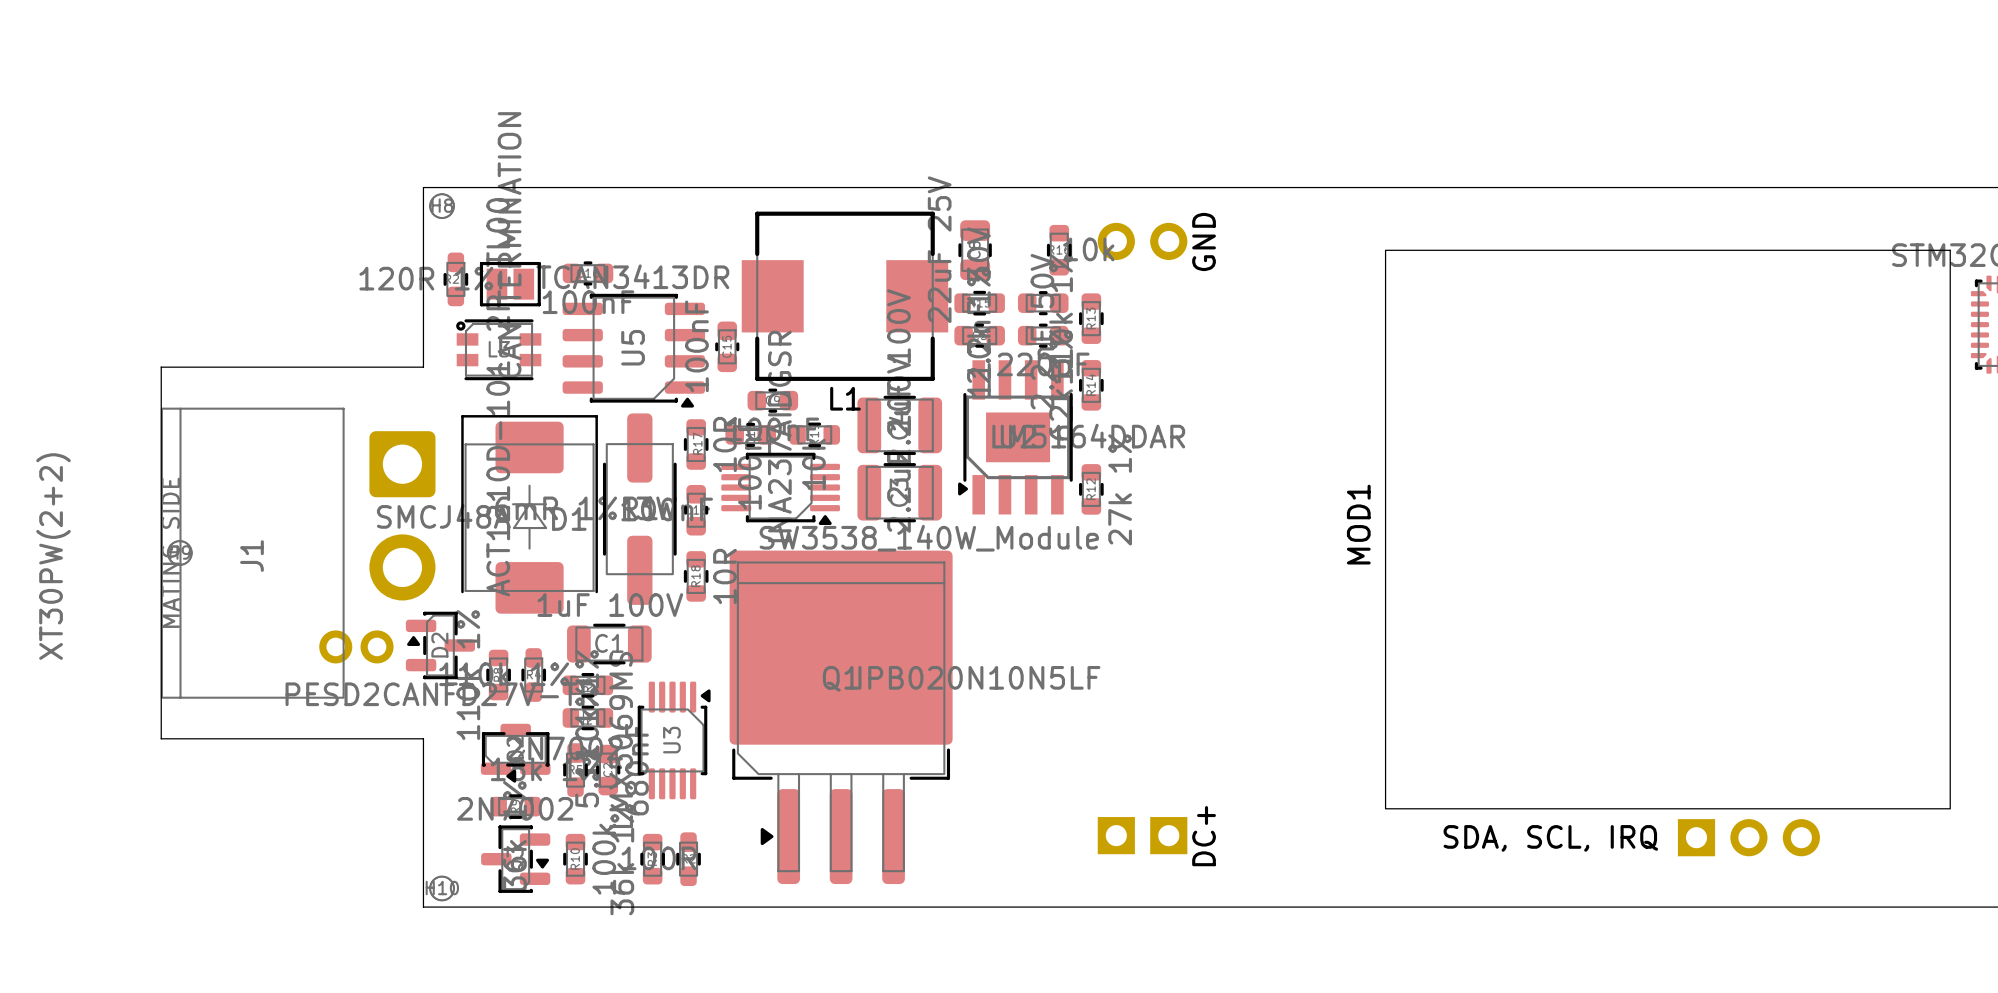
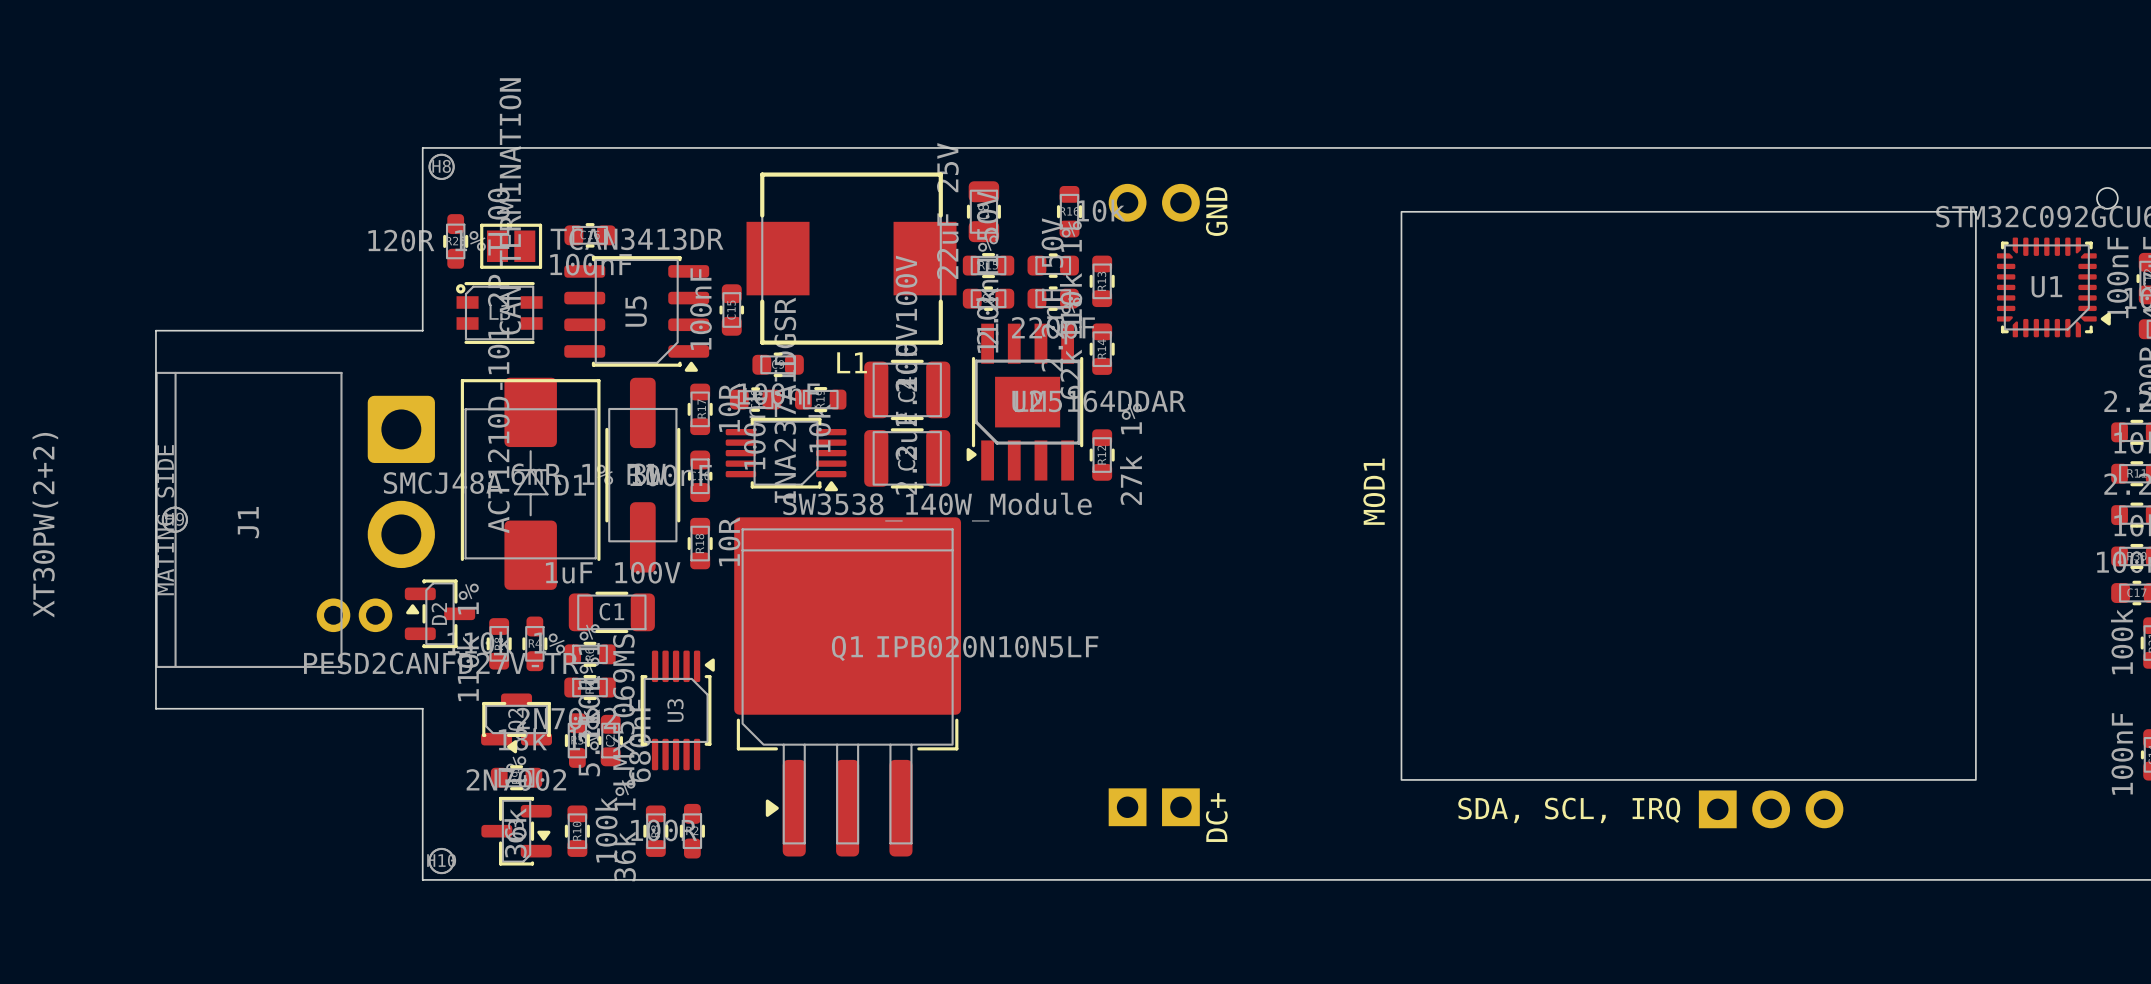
D1 footprint: [461, 415, 598, 614] -> [460, 377, 601, 590]

